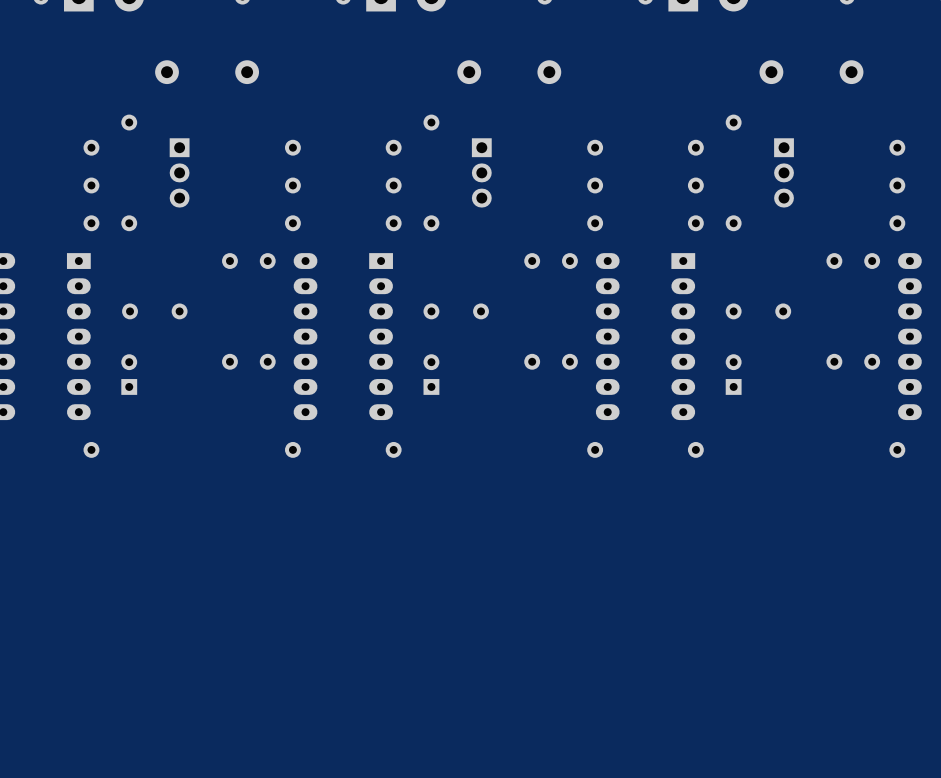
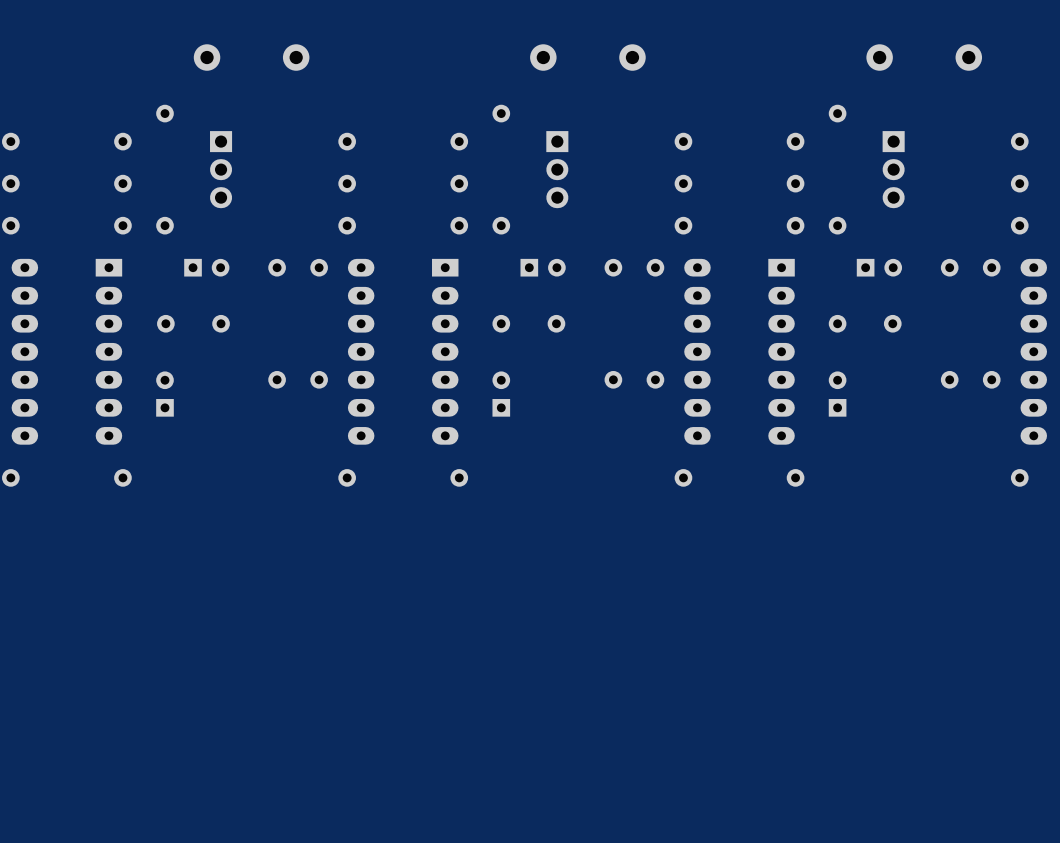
part: none -> (206, 267)
part: none -> (543, 267)
part: none -> (879, 267)

